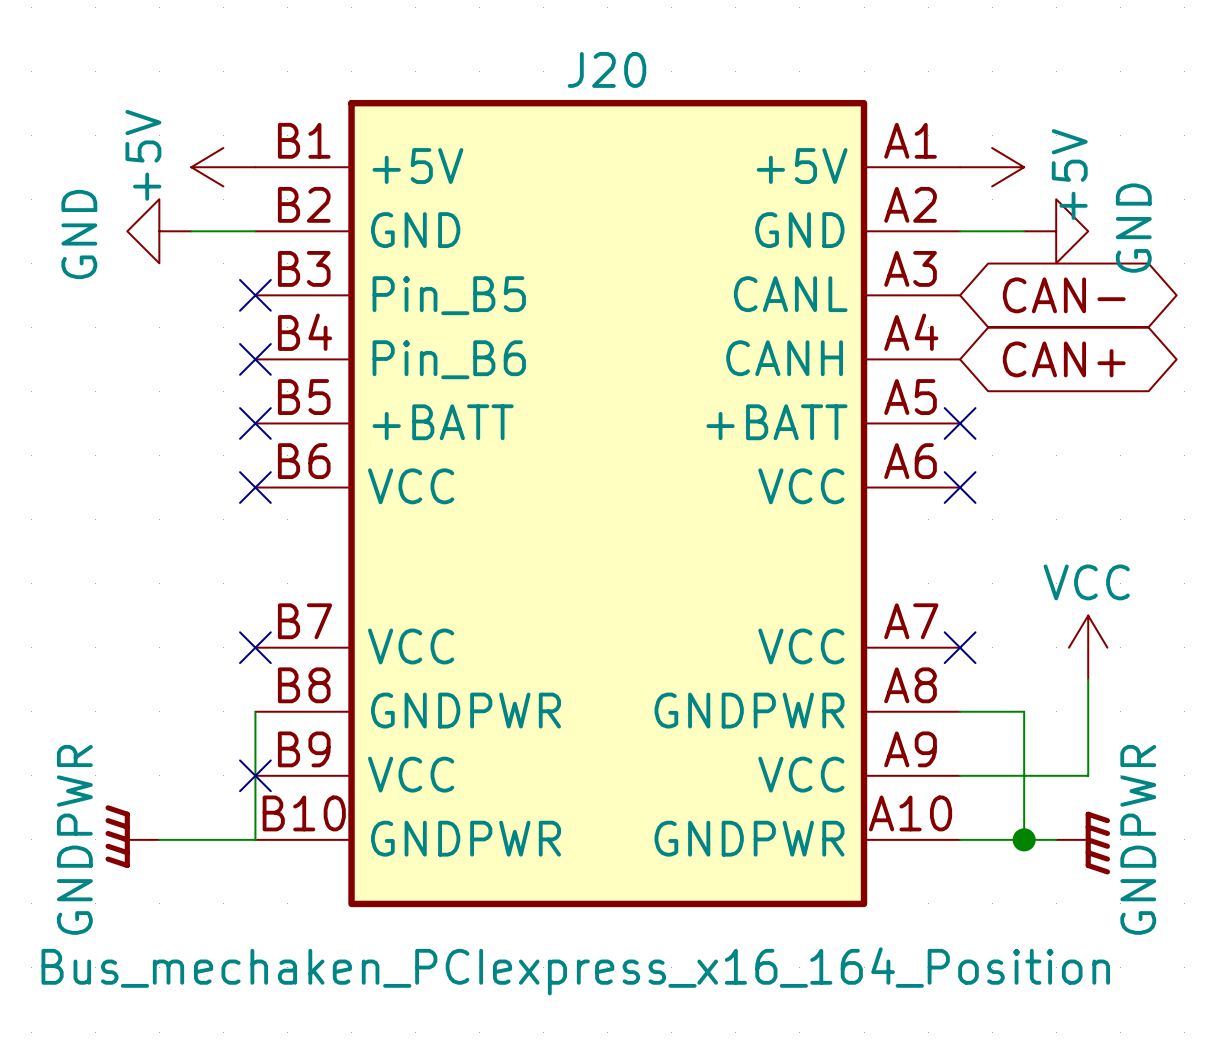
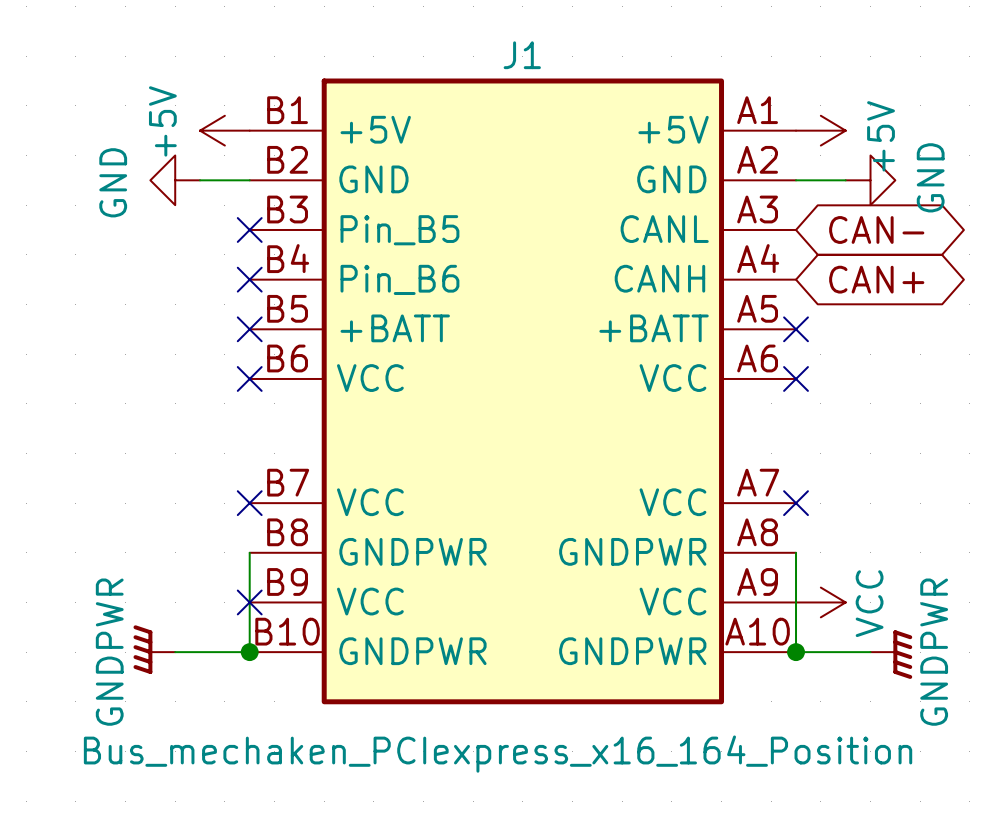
J20 name: J20 (607, 69) -> J1 (522, 55)
power symbol rotation: 0° (1088, 647) -> 90° clockwise (820, 602)
power symbol position: VCC (1088, 647) -> VCC (820, 602)
wire: (1088, 679) (1088, 775) (960, 775) -> none
wire: (960, 711) (1024, 711) (1024, 839) -> (796, 552) (796, 652)
junction: none -> (249, 652)
junction position: (1024, 839) -> (796, 652)

